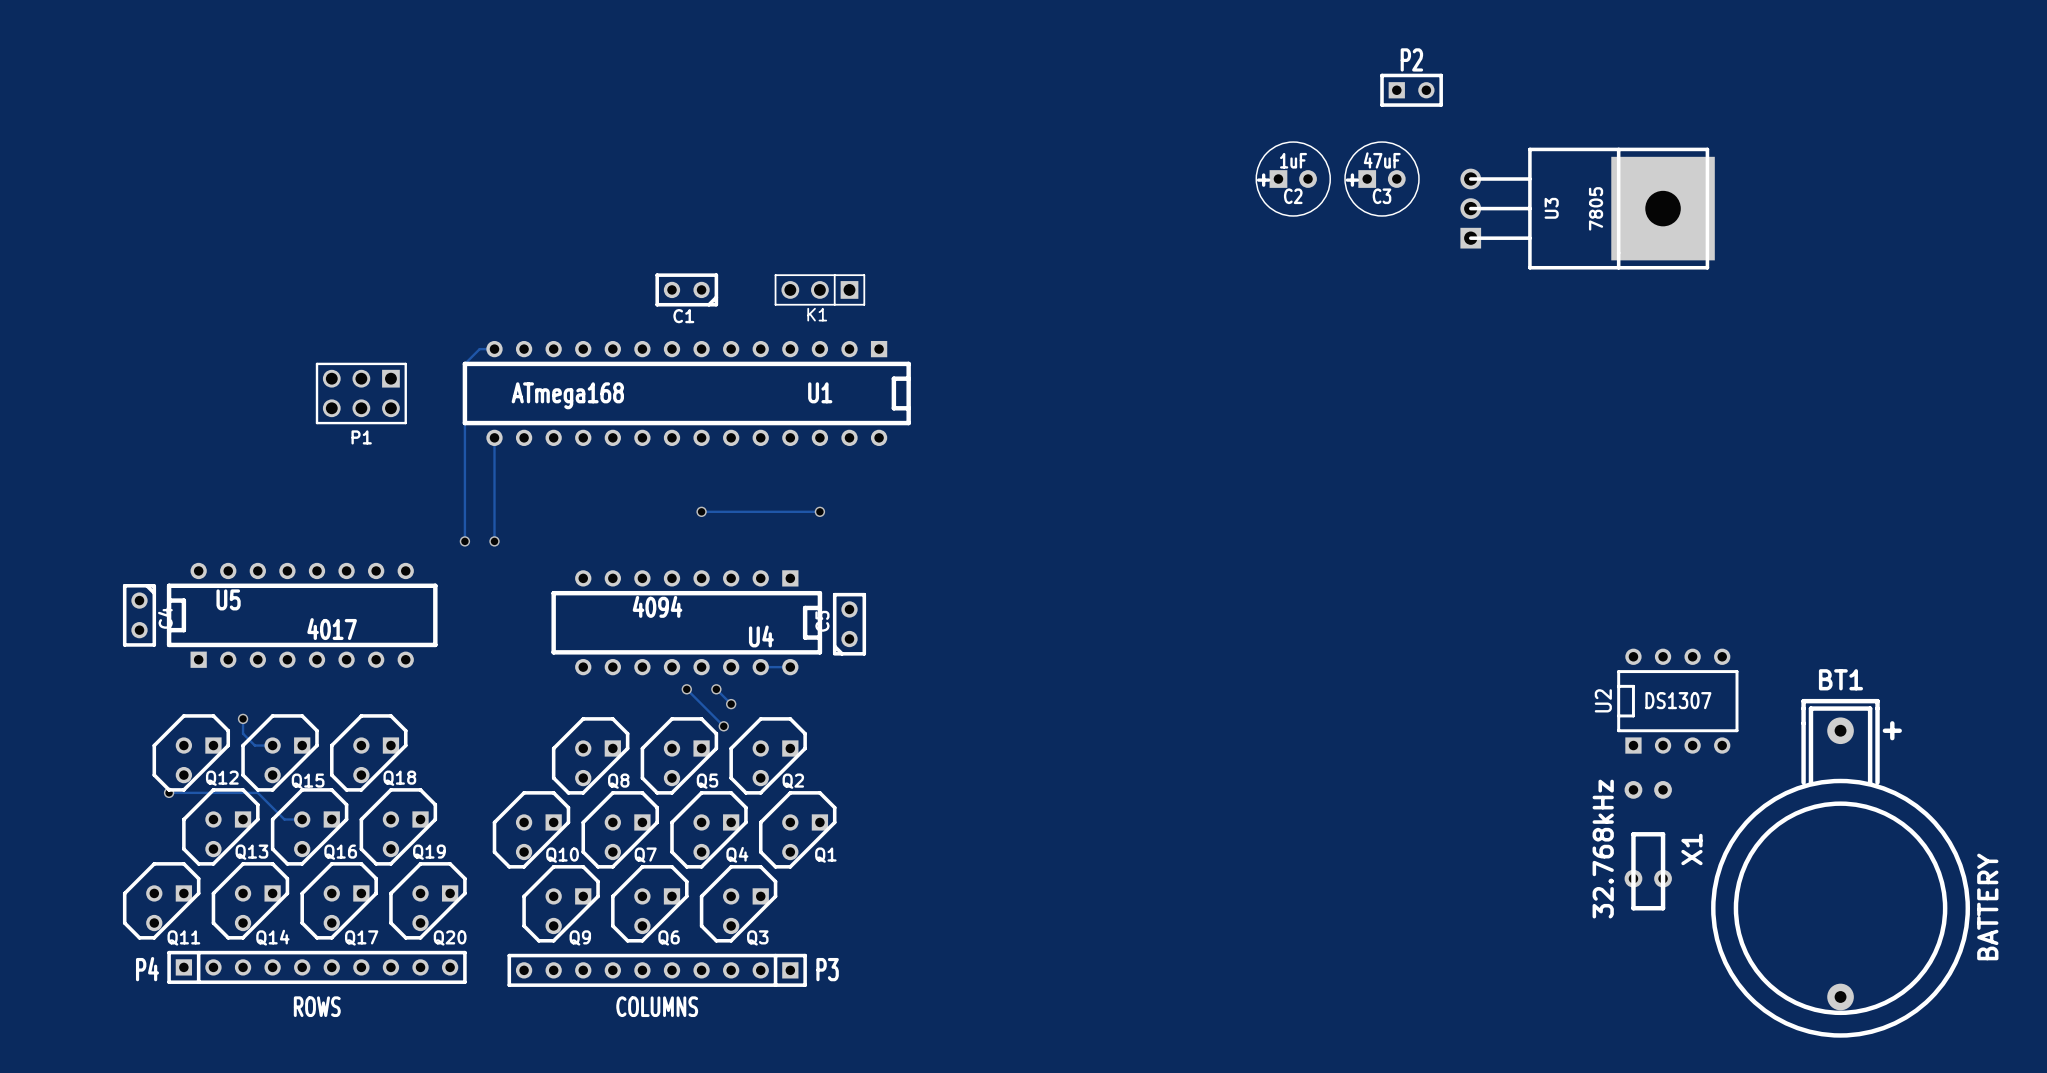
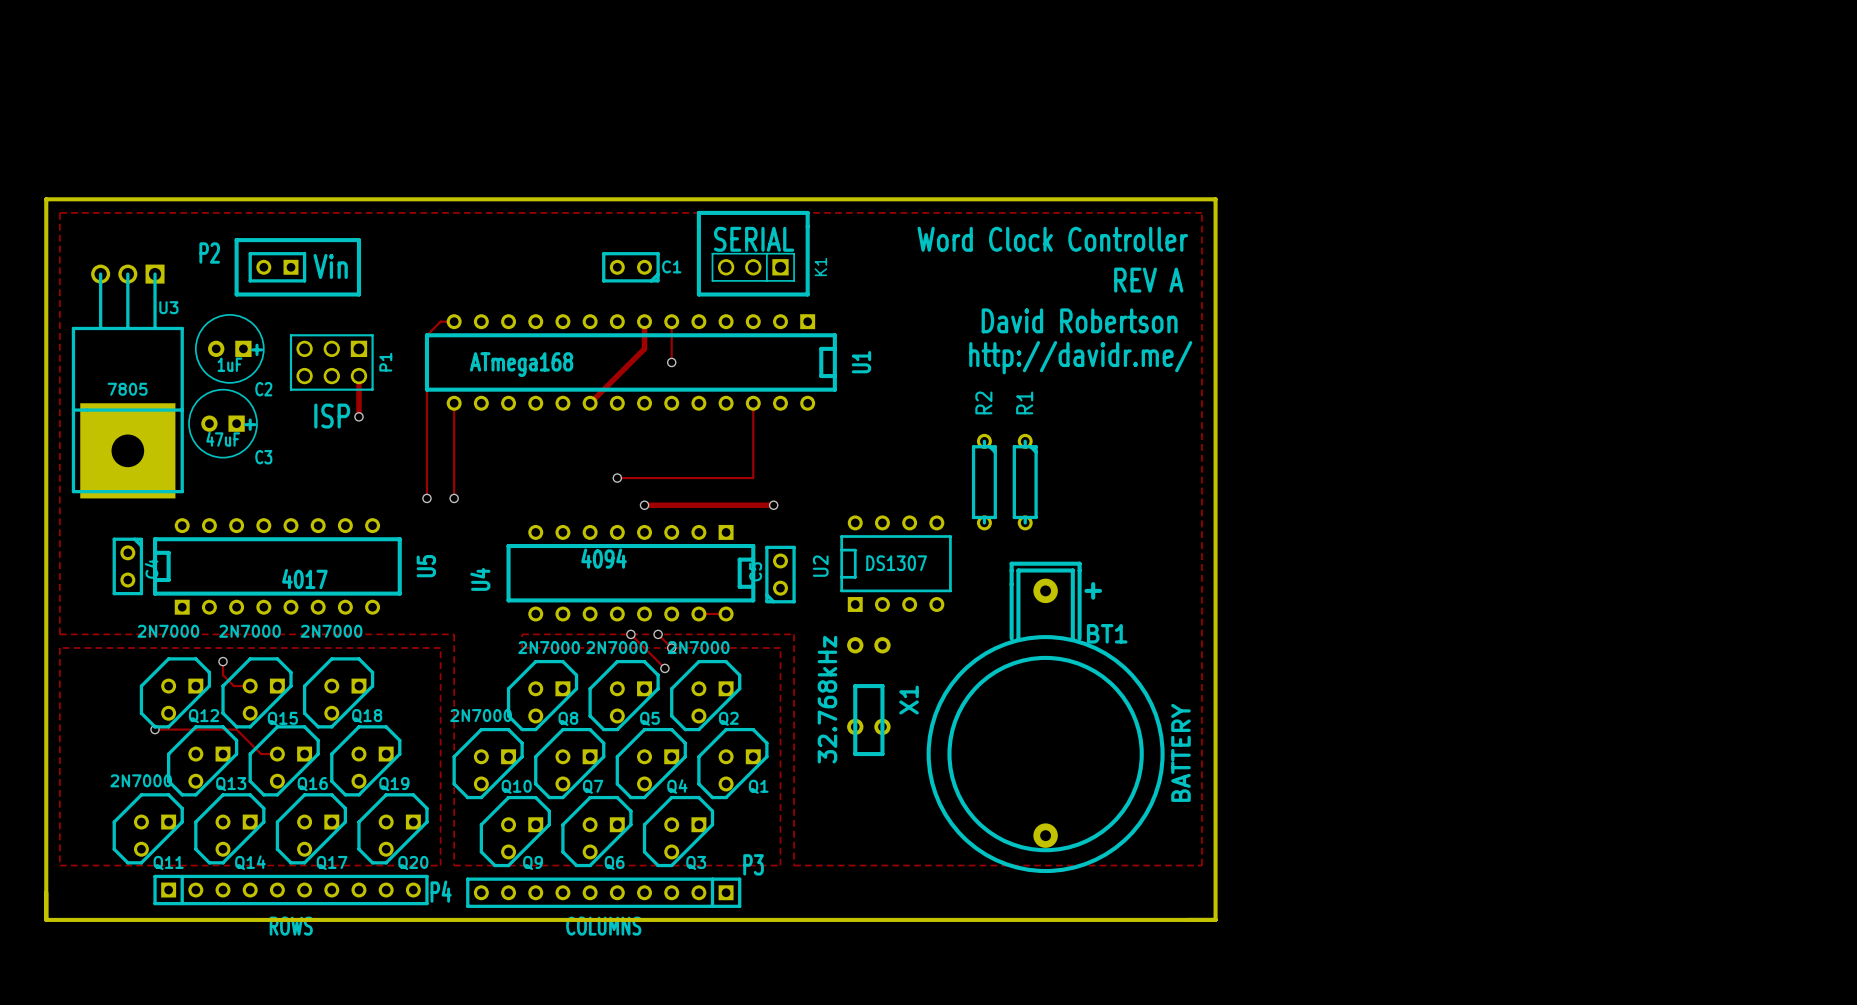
P2 name position: P2 (1411, 59) -> P2 (209, 253)
P2 rotation: 0° (1411, 90) -> 180° (277, 267)
P2 position: (1411, 90) -> (277, 267)
U3 footprint: [1460, 147, 1715, 270] -> [71, 264, 184, 499]
C2 rotation: 0° (1293, 179) -> 180° (229, 348)
C2 position: (1293, 179) -> (229, 348)
C3 rotation: 0° (1382, 179) -> 180° (223, 423)
C3 position: (1382, 179) -> (223, 423)
C2 name position: C2 (1293, 196) -> C2 (263, 389)
C3 name position: C3 (1382, 196) -> C3 (263, 457)
U3 name position: U3 (1551, 208) -> U3 (168, 307)
board edge: none -> (46, 199) (46, 919) (1215, 919) (1215, 199) (46, 199)
zone outline: none -> (59, 212) (59, 634) (454, 634) (454, 865) (780, 865) (780, 648) (522, 648) (522, 634) (794, 634) (794, 865) (1201, 865) (1201, 212) (59, 212)
line: none -> (698, 212) (807, 212) (807, 294) (698, 294) (698, 212)
text: none -> SERIAL (754, 239)
text: none -> Word Clock Controller (1052, 239)
line: none -> (236, 240) (358, 240) (358, 294) (236, 294) (236, 240)
text: none -> Vin (330, 266)
text: none -> REV A (1148, 280)
K1 name rotation: 0° (817, 314) -> 90° counterclockwise (820, 267)
K1 name position: K1 (817, 314) -> K1 (820, 267)
C1 name position: C1 (683, 316) -> C1 (671, 266)
text: none -> David Robertson (1079, 320)
track: none -> (644, 321) (644, 348) (590, 403)
track: none -> (671, 321) (671, 362)
text: none -> http://davidr.me/ (1080, 357)
U1 name rotation: 0° (820, 392) -> 90° counterclockwise (861, 362)
U1 name position: U1 (820, 392) -> U1 (861, 362)
via: none -> (671, 362)
track: none -> (358, 376) (358, 416)
P1 name rotation: 0° (361, 437) -> 90° counterclockwise (385, 362)
P1 name position: P1 (361, 437) -> P1 (385, 362)
track: none -> (753, 403) (753, 478) (617, 478)
text: none -> ISP (332, 416)
via: none -> (358, 416)
track: (701, 511) (819, 511) -> none
via: (701, 511) -> none
via position: (819, 511) -> (773, 505)
via: none -> (617, 478)
R2: none -> (984, 482)
R1: none -> (1025, 482)
track: none -> (644, 505) (773, 505)
via: none -> (644, 505)
U5 name rotation: 0° (228, 599) -> 90° counterclockwise (426, 566)
U5 name position: U5 (228, 599) -> U5 (426, 566)
U4 name rotation: 0° (761, 636) -> 90° counterclockwise (480, 579)
U4 name position: U4 (761, 636) -> U4 (480, 579)
BT1 name position: BT1 (1840, 679) -> BT1 (1107, 633)
Q12 value: none -> 2N7000 (168, 631)
Q15 value: none -> 2N7000 (249, 631)
Q18 value: none -> 2N7000 (331, 631)
U2 name position: U2 (1603, 700) -> U2 (820, 566)
U2 position: (1677, 701) -> (896, 563)
Q8 value: none -> 2N7000 (549, 647)
Q5 value: none -> 2N7000 (617, 647)
Q2 value: none -> 2N7000 (698, 647)
zone outline: none -> (59, 648) (440, 648) (440, 865) (59, 865) (59, 648)
Q10 value: none -> 2N7000 (481, 715)
X1 position: (1648, 845) -> (868, 696)
Q11 value: none -> 2N7000 (141, 780)
BT1 position: (1840, 868) -> (1045, 717)
P4 name position: P4 (147, 969) -> P4 (441, 891)
P3 name position: P3 (827, 969) -> P3 (753, 864)

